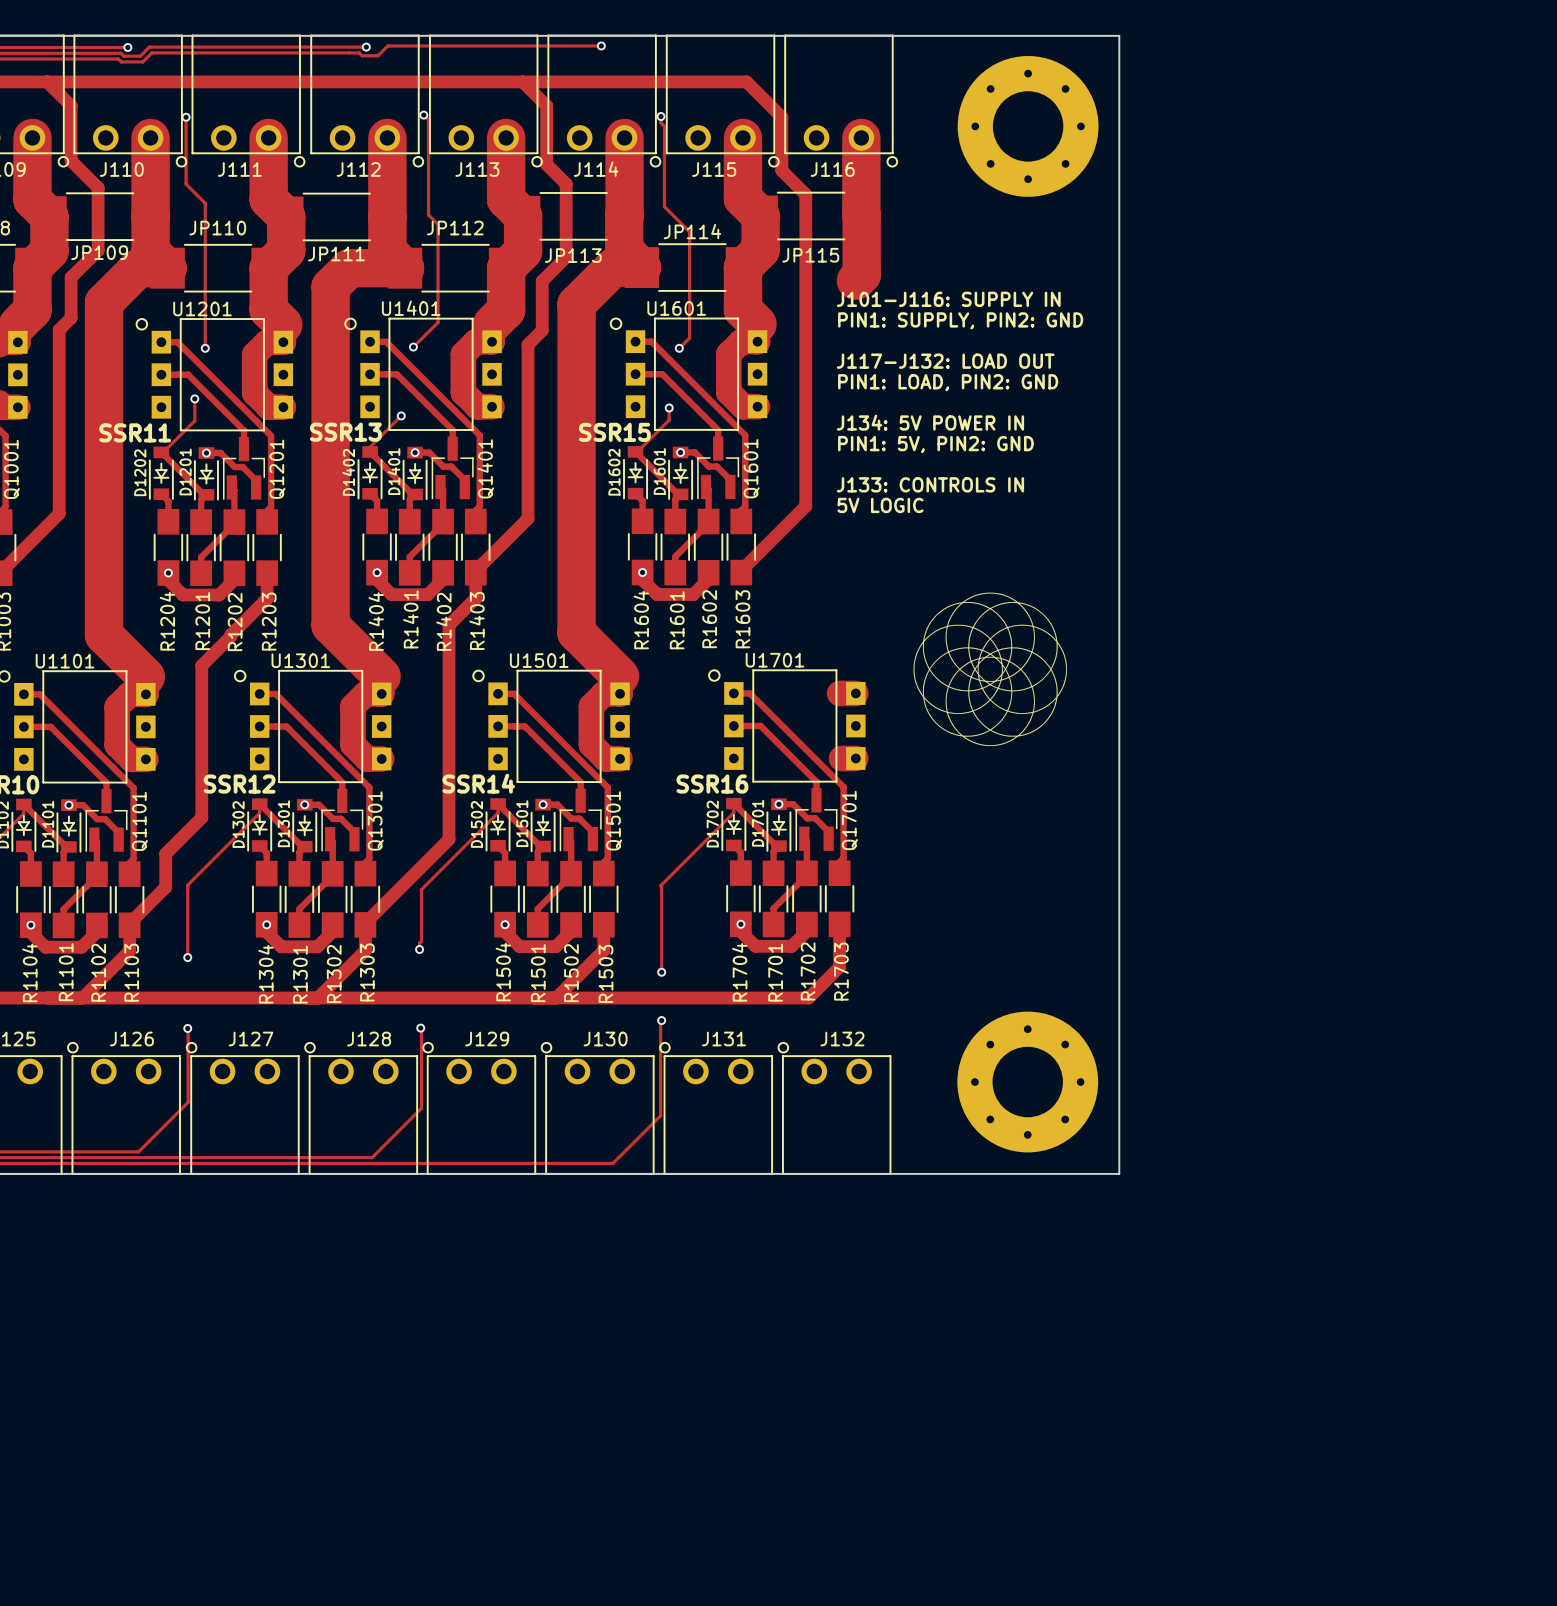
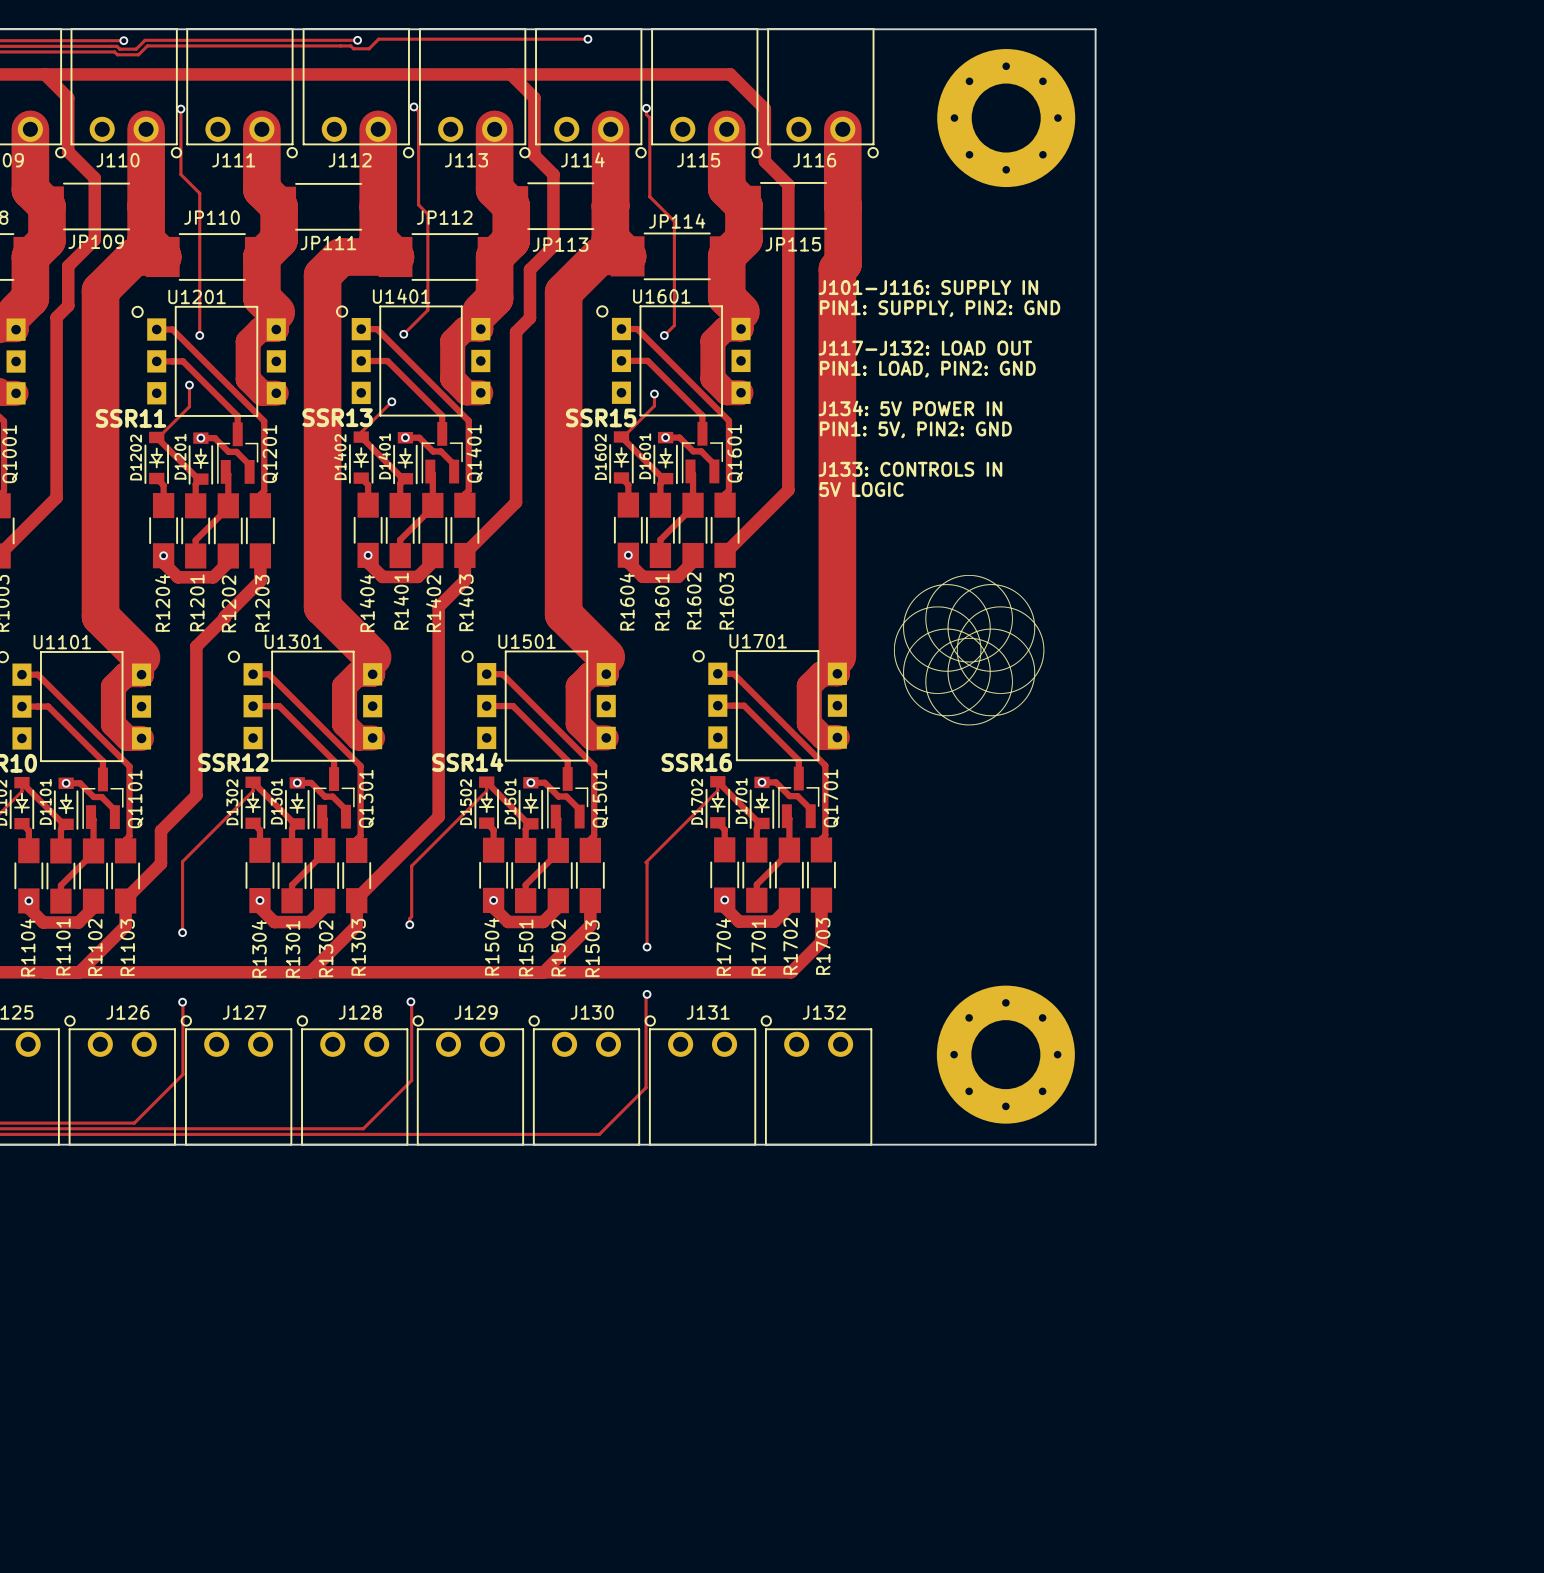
track: none -> (837, 269) (837, 673)
track: none -> (821, 673) (809, 685) (809, 723) (823, 737)

